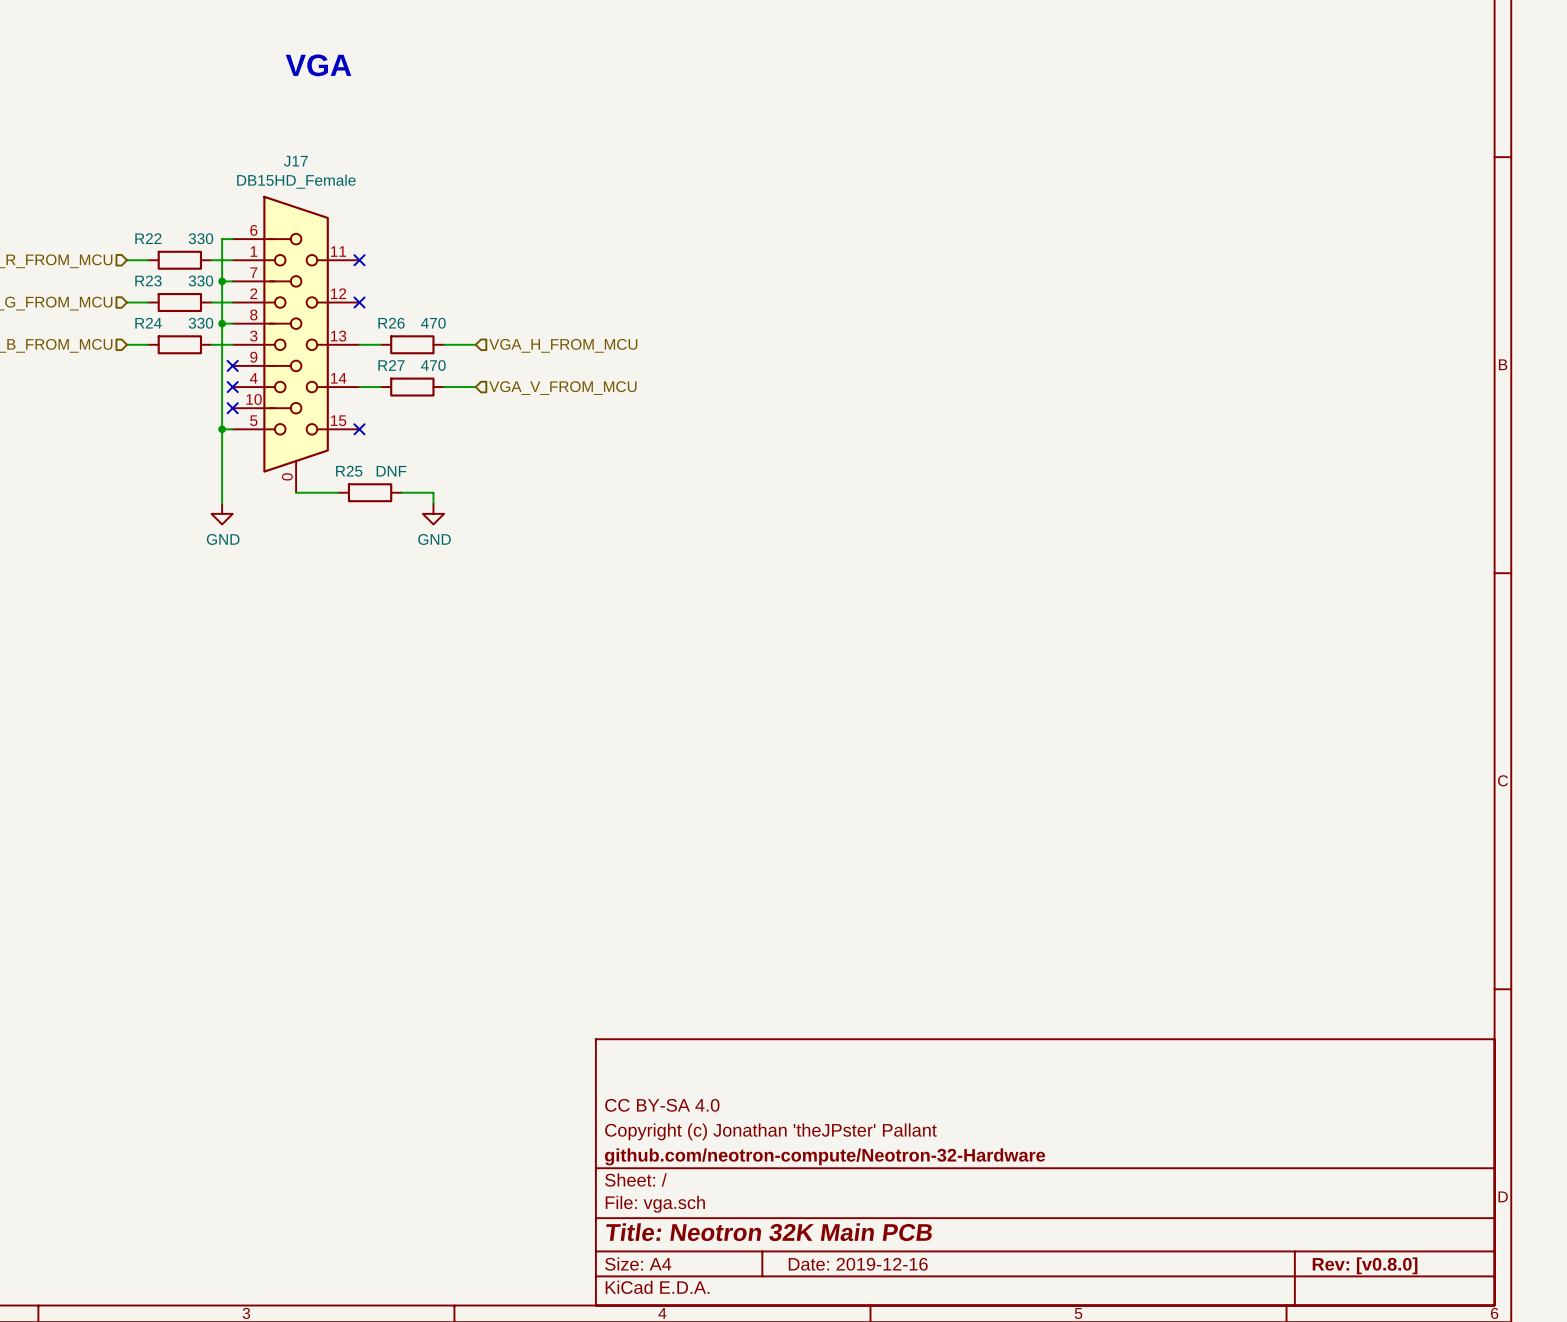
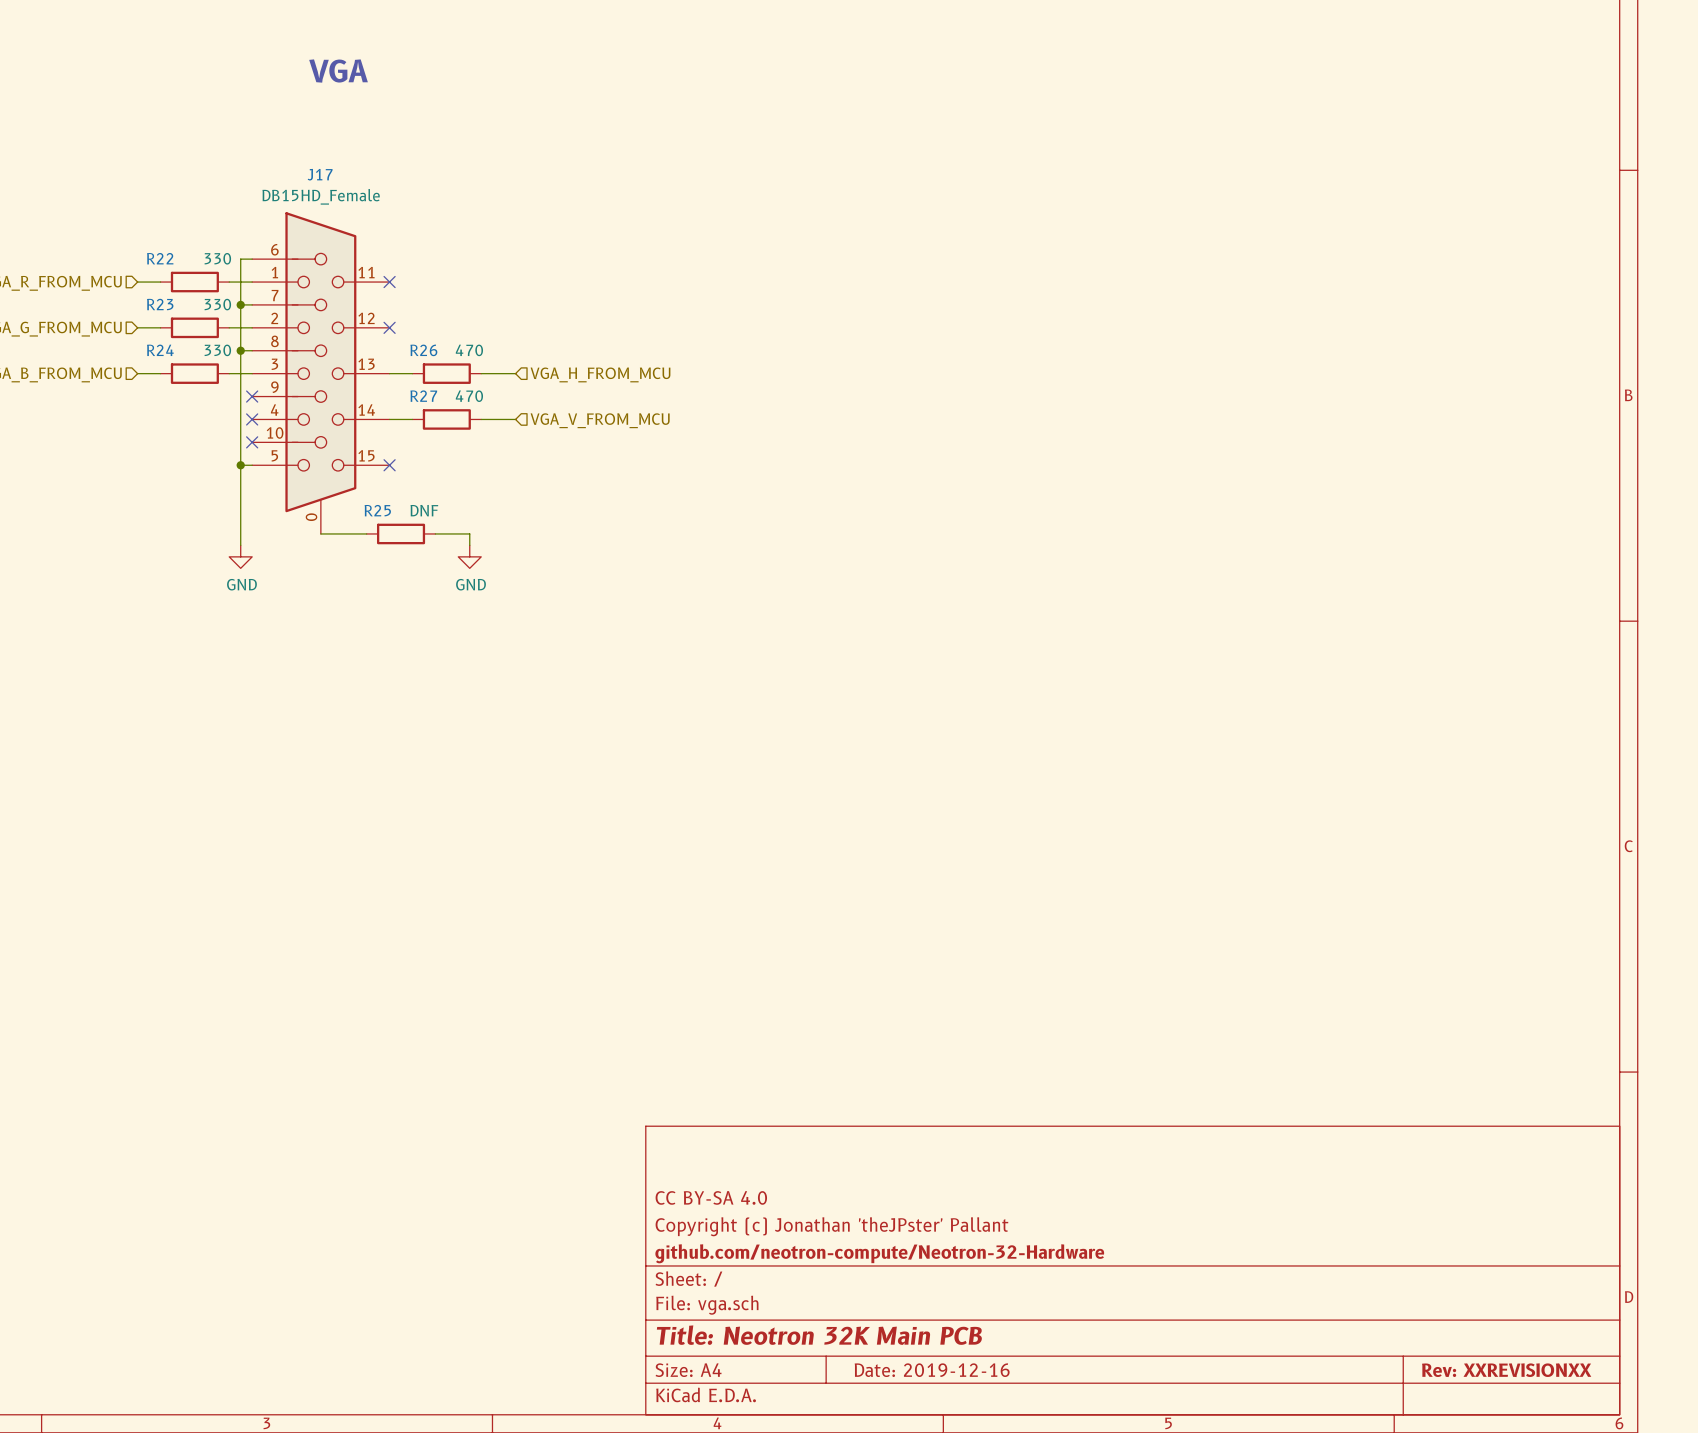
title block: Rev: [v0.8.0] (1365, 1265) -> Rev: XXREVISIONXX (1506, 1370)

